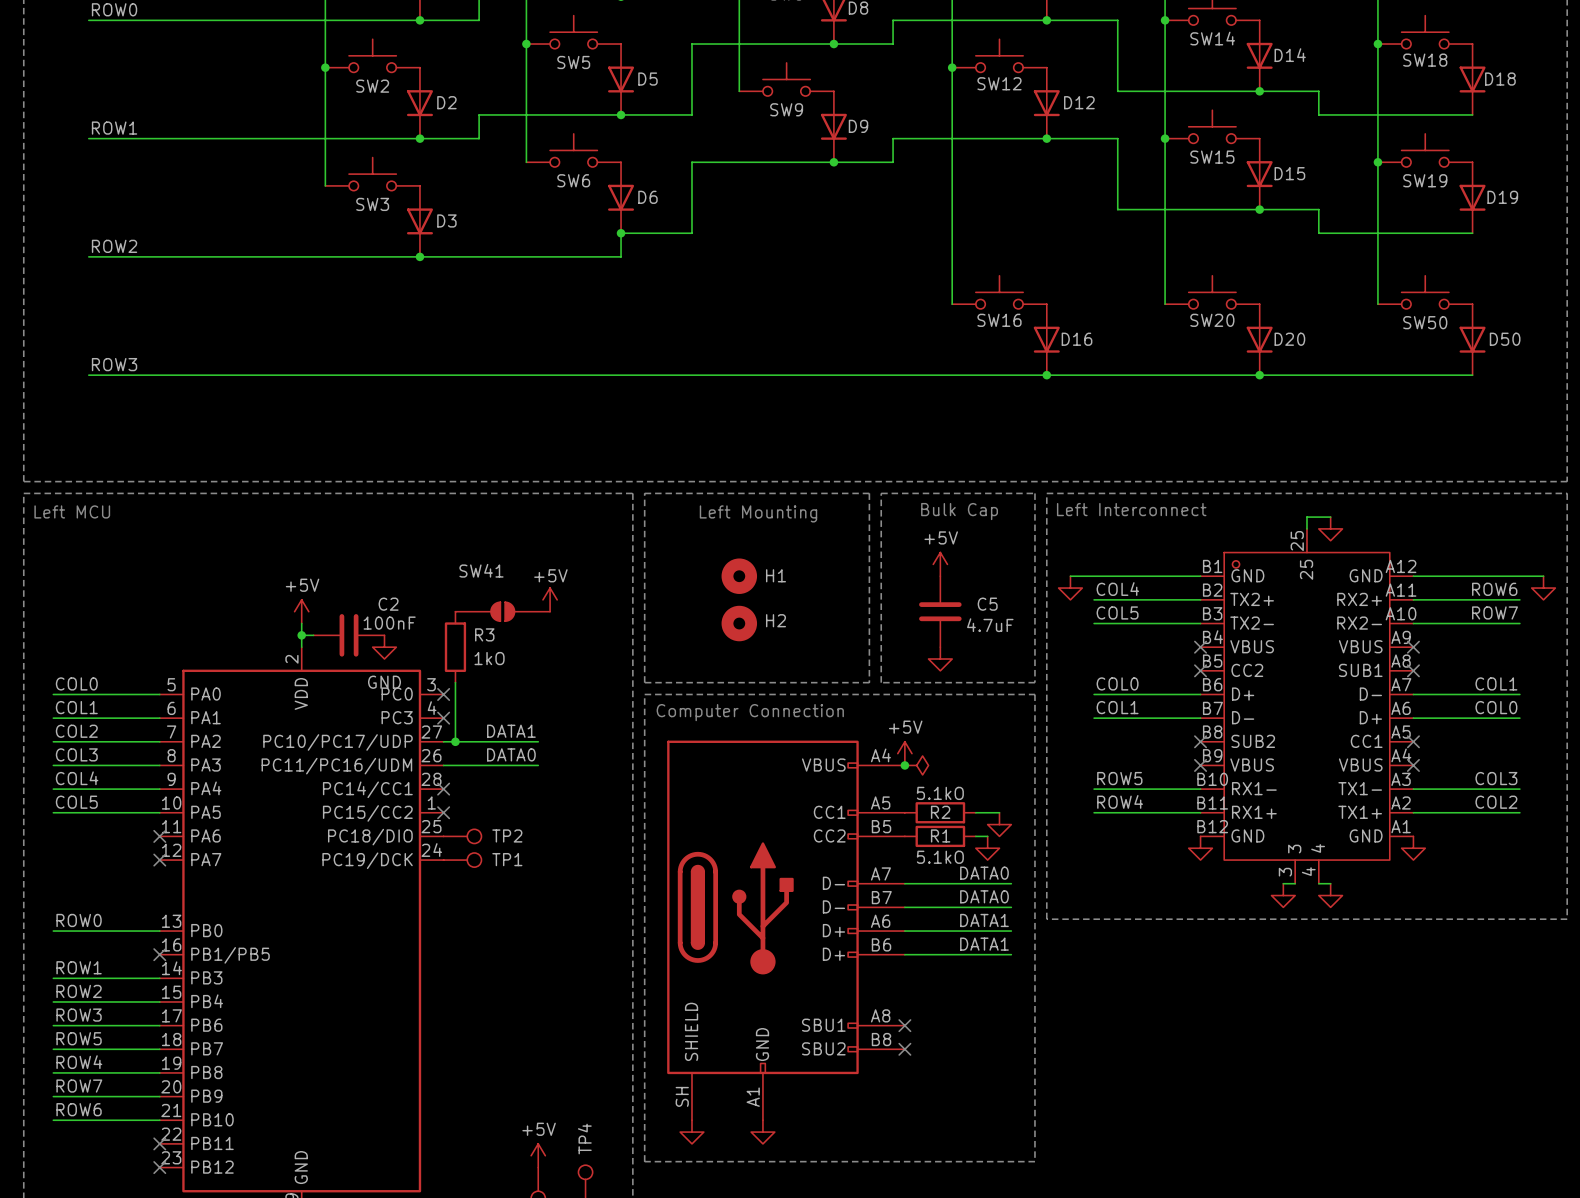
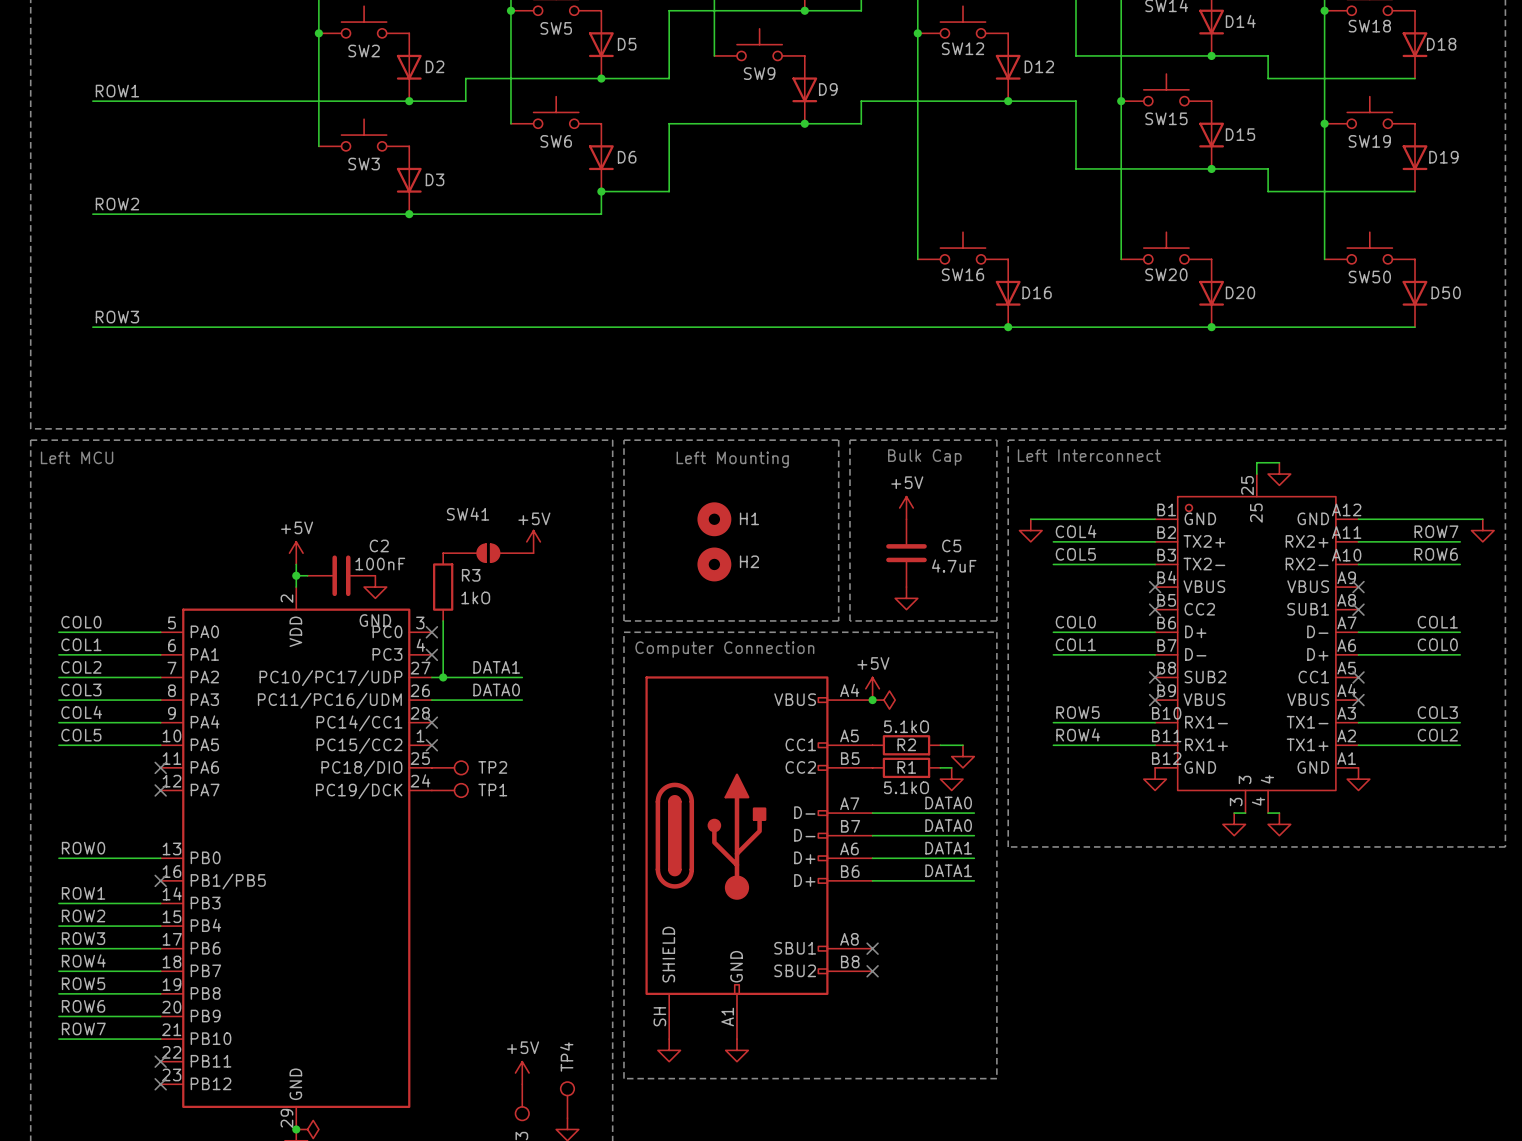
label: ROW6 (1494, 589) -> ROW7 (1436, 531)
label: ROW7 (1495, 612) -> ROW6 (1436, 554)
label: ROW5 (79, 1038) -> ROW4 (83, 960)
label: ROW4 (79, 1062) -> ROW5 (83, 983)
label: ROW7 (79, 1086) -> ROW6 (83, 1006)
label: ROW6 (79, 1109) -> ROW7 (83, 1028)

